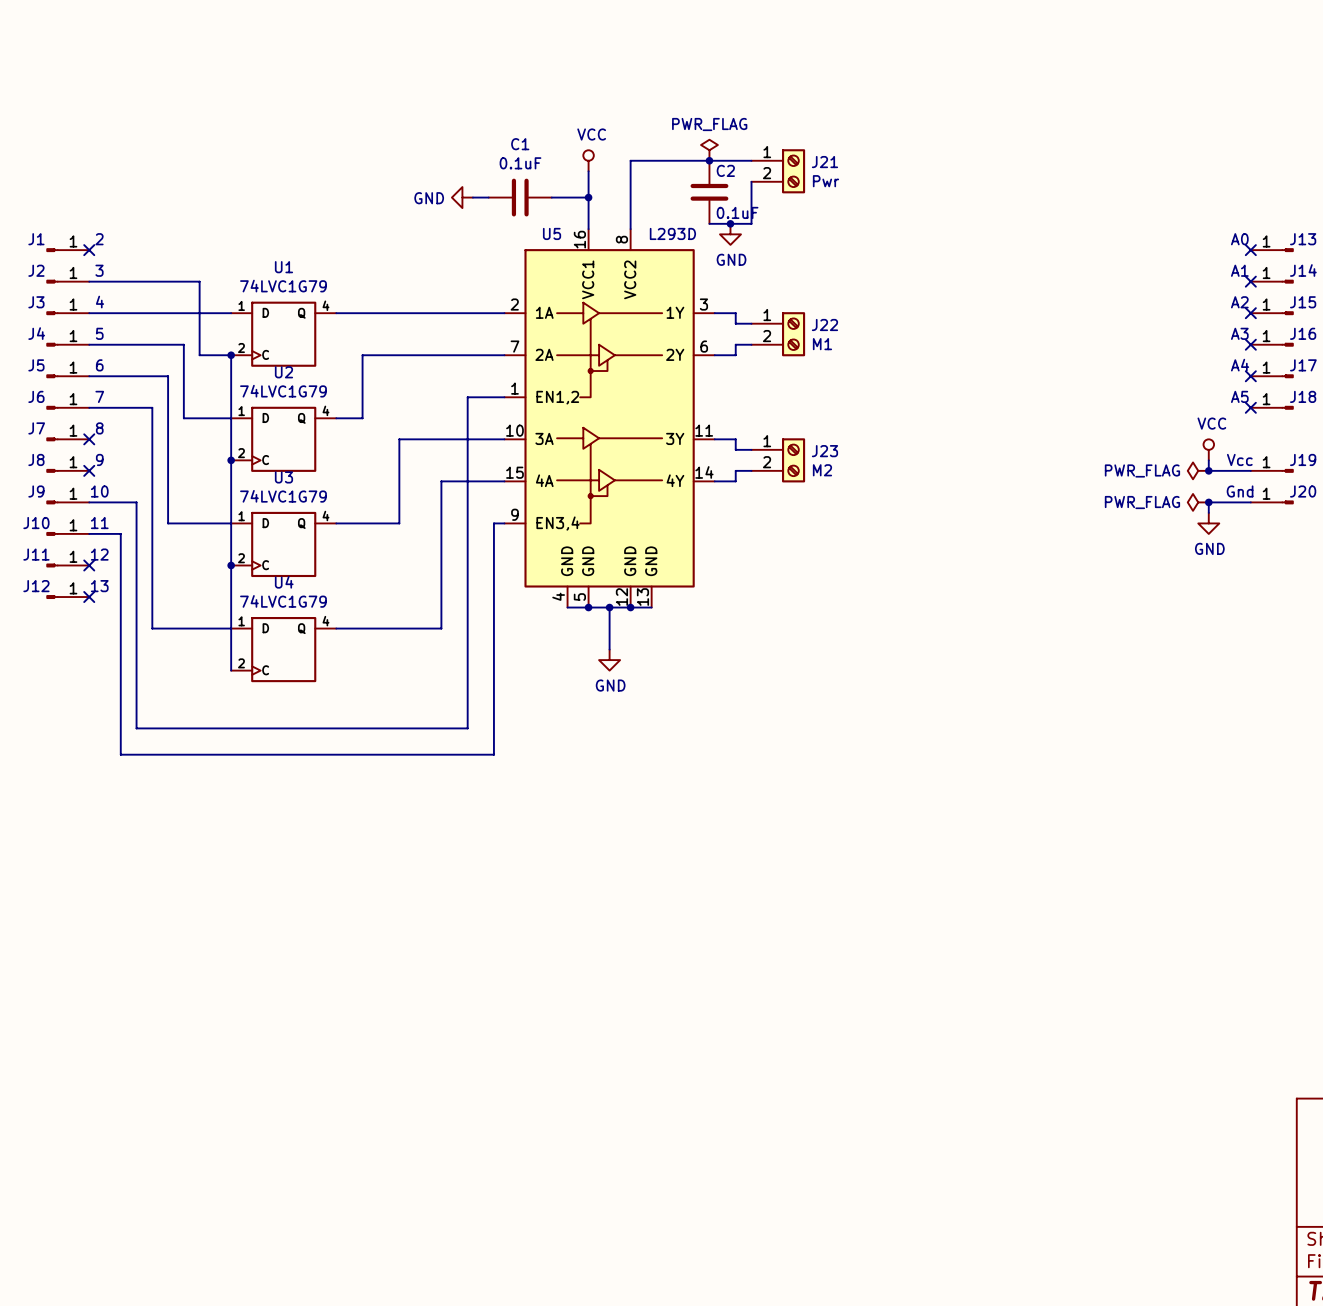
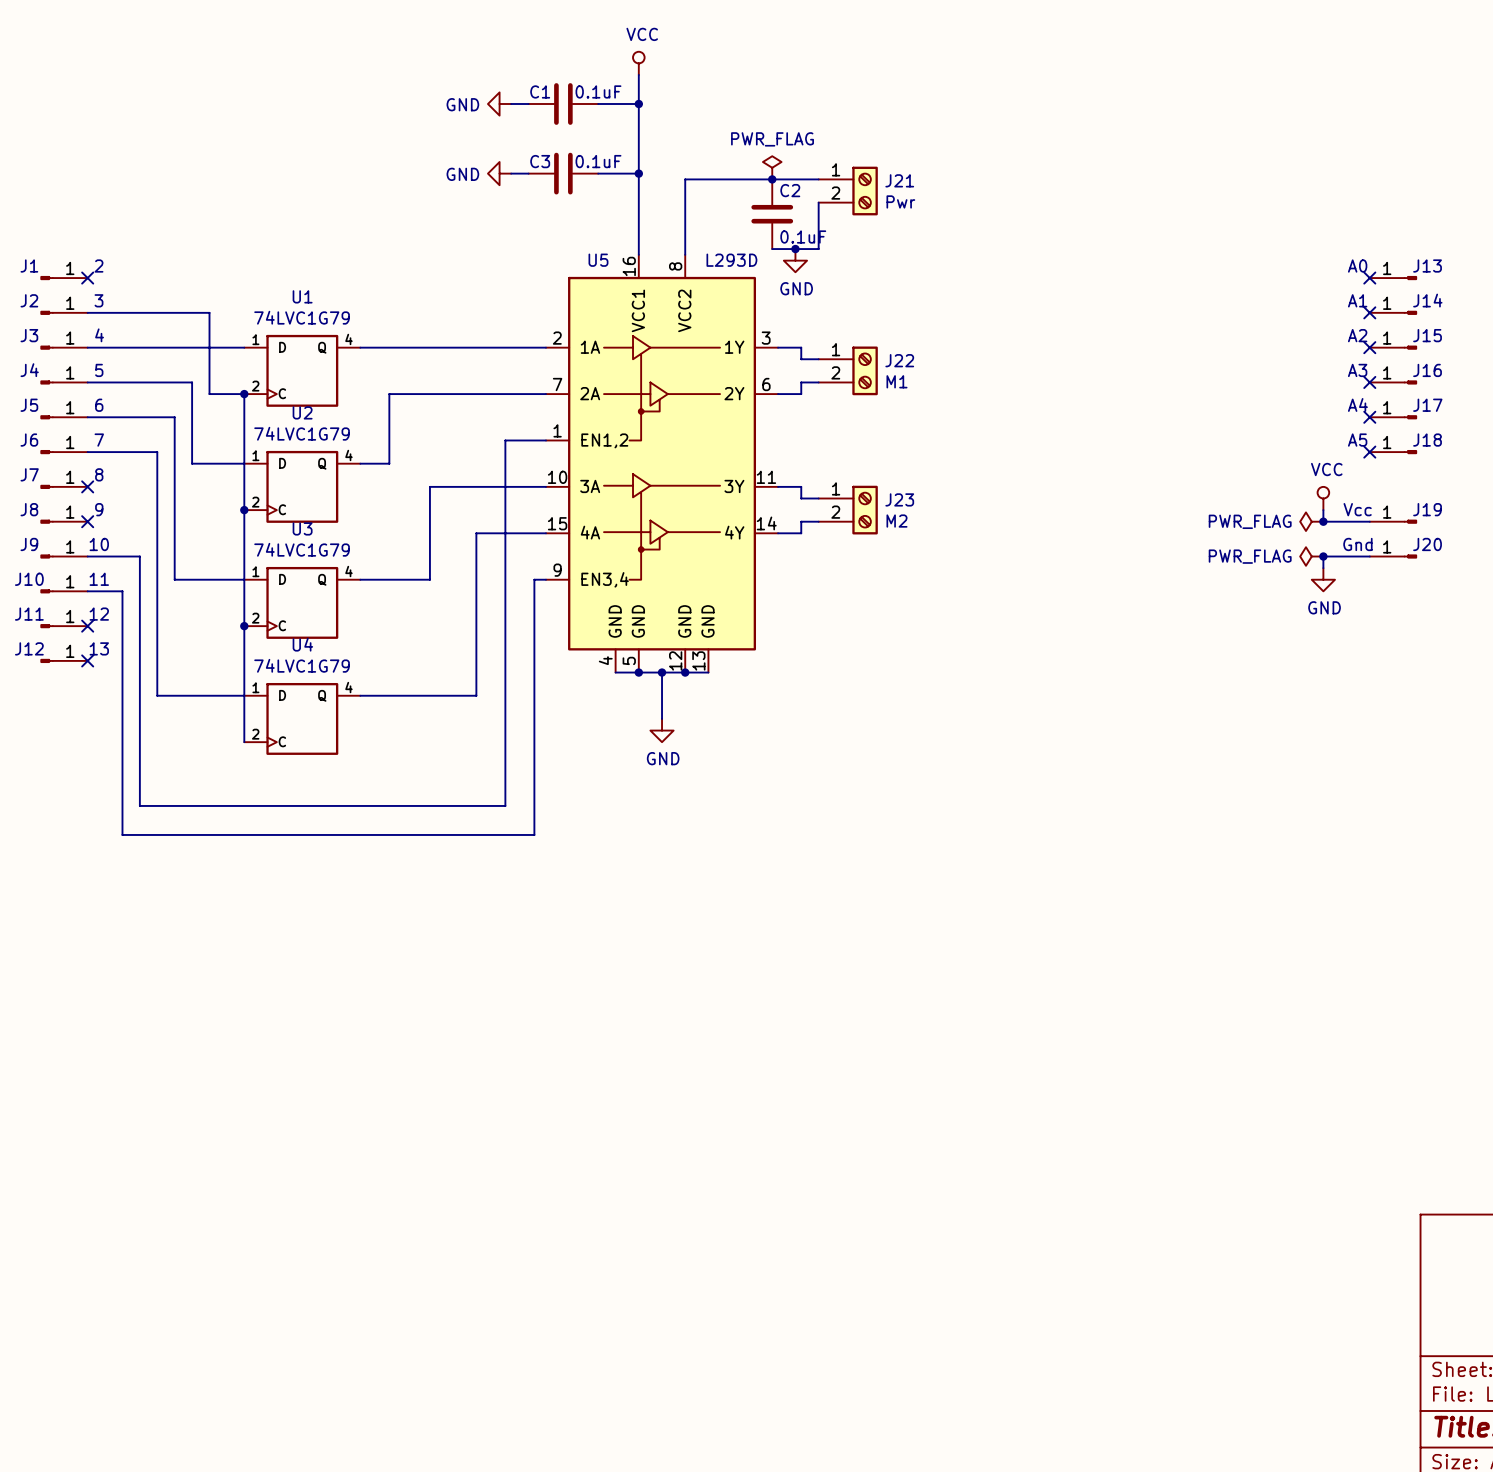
wire: none -> (638, 74) (638, 191)
power symbol: none -> GND (499, 103)
wire: none -> (511, 103) (528, 103)
wire: none -> (598, 103) (638, 103)
junction: none -> (638, 103)
C1 name position: C1 (520, 144) -> C1 (540, 91)
C3: none -> 0.1uF (563, 173)
power symbol position: VCC (588, 160) -> VCC (638, 63)
C1 value position: 0.1uF (520, 163) -> 0.1uF (598, 91)
power symbol position: GND (462, 197) -> GND (499, 173)
wire: (472, 197) (488, 197) -> (511, 173) (528, 173)
C1 position: (520, 197) -> (563, 103)
wire: (551, 197) (588, 197) -> (598, 173) (638, 173)
junction position: (588, 197) -> (638, 173)

